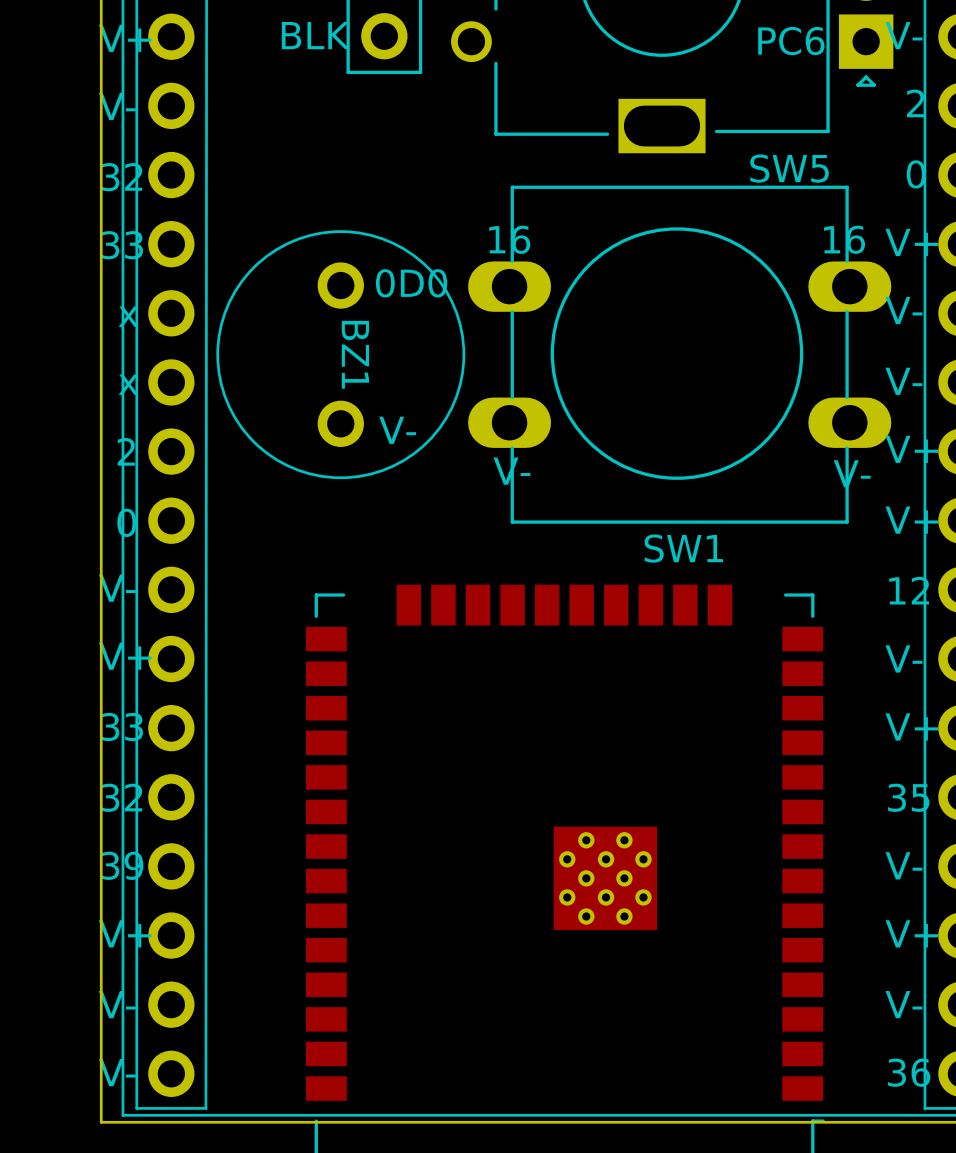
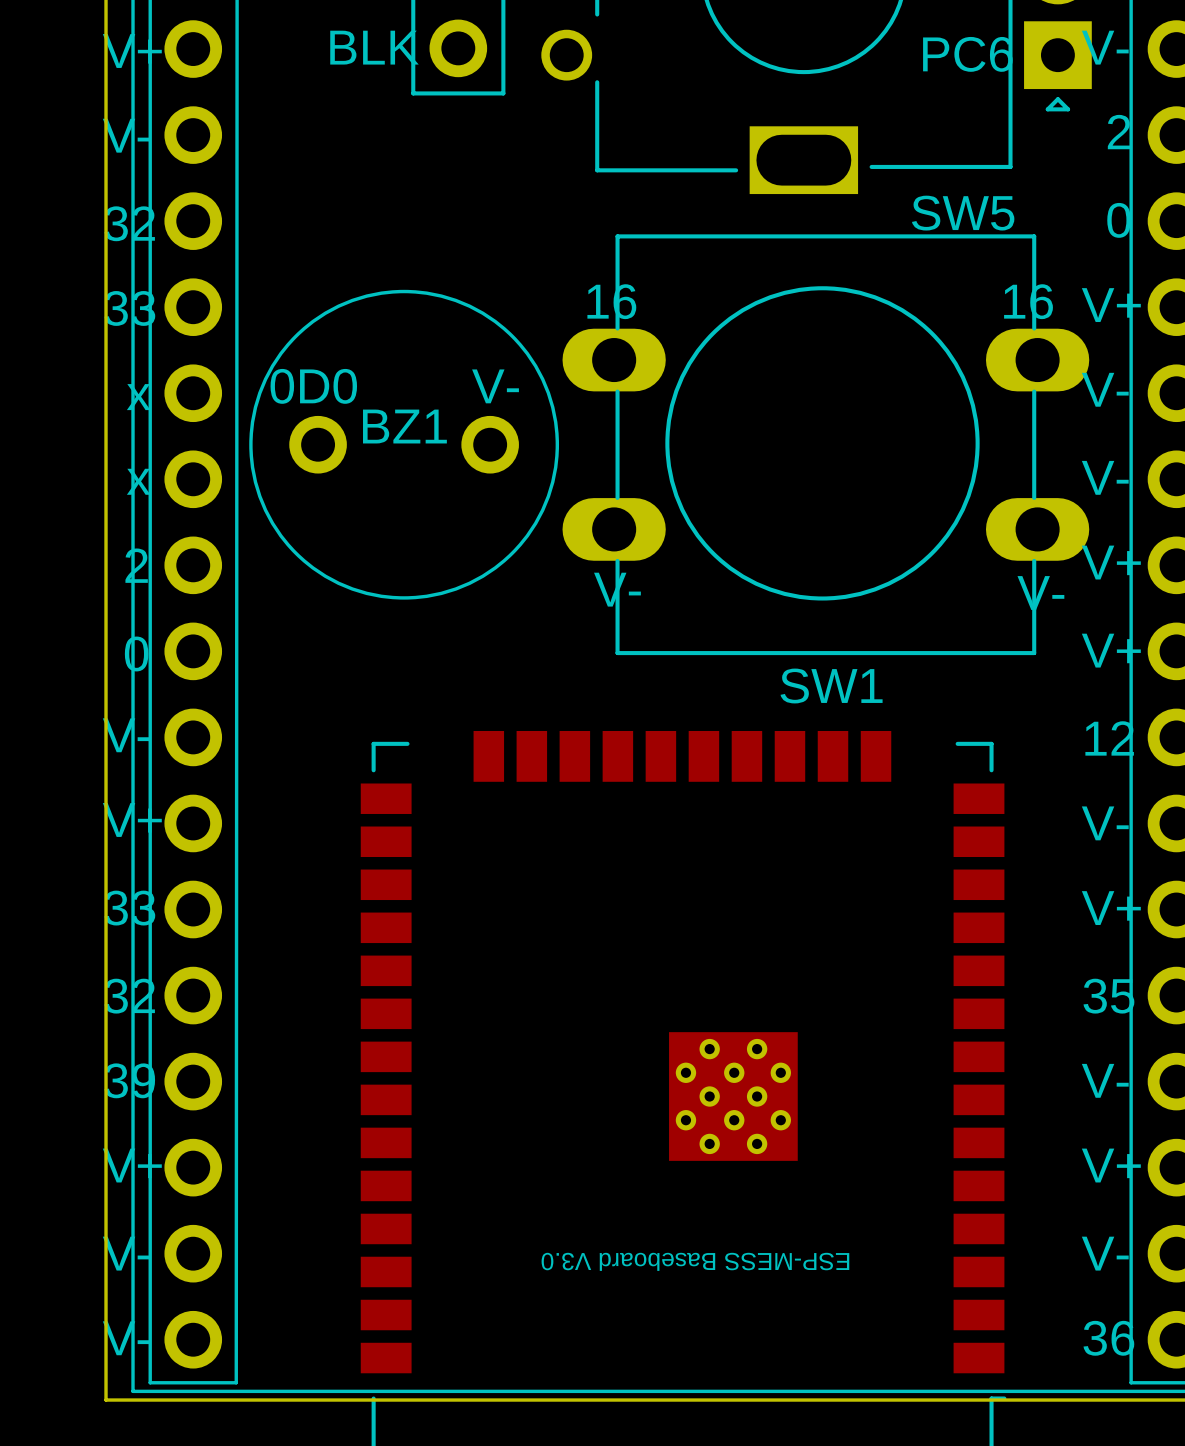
text position: 0D0 (411, 283) -> 0D0 (313, 386)
BZ1 rotation: 0° (340, 354) -> 90° clockwise (404, 444)
text position: V- (397, 430) -> V- (495, 386)
text: none -> ESP-MESS Baseboard V3.0 (695, 1261)

